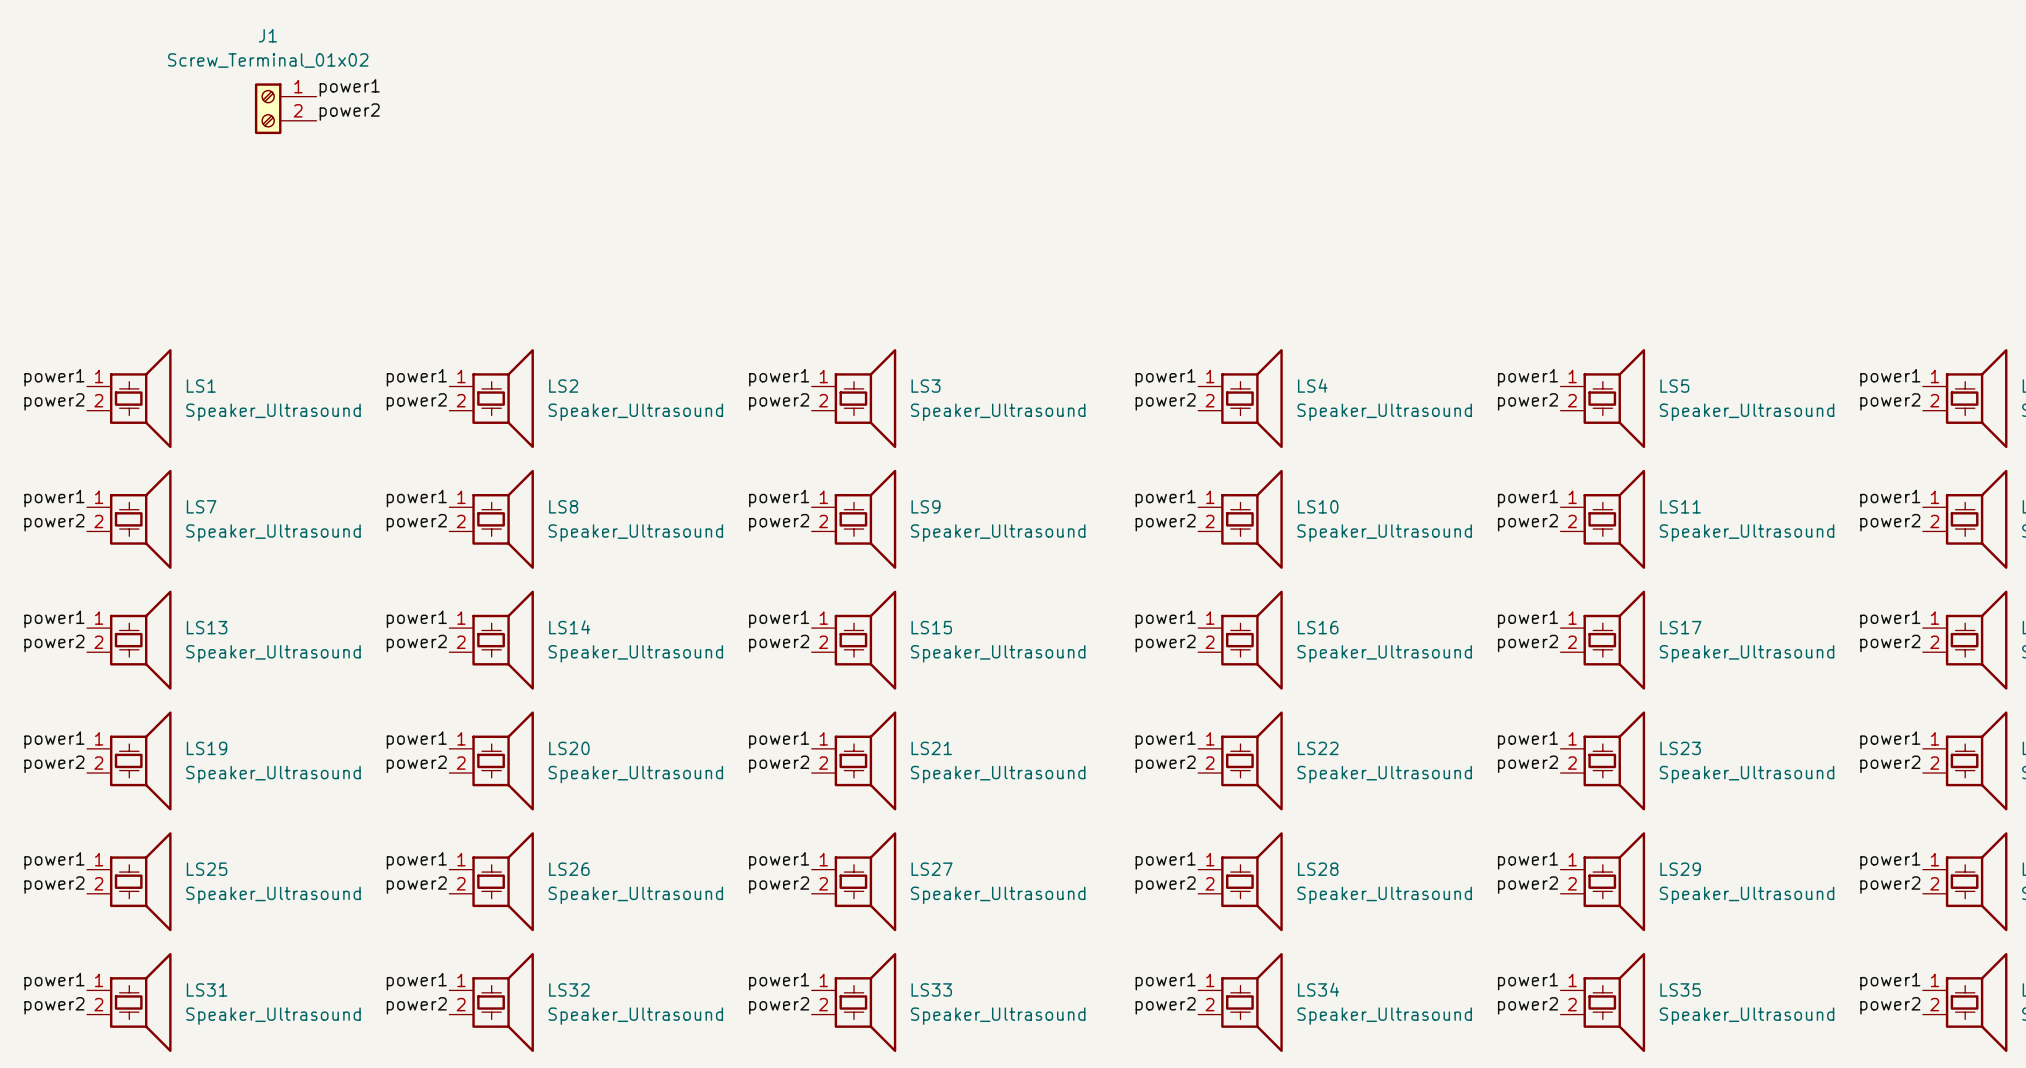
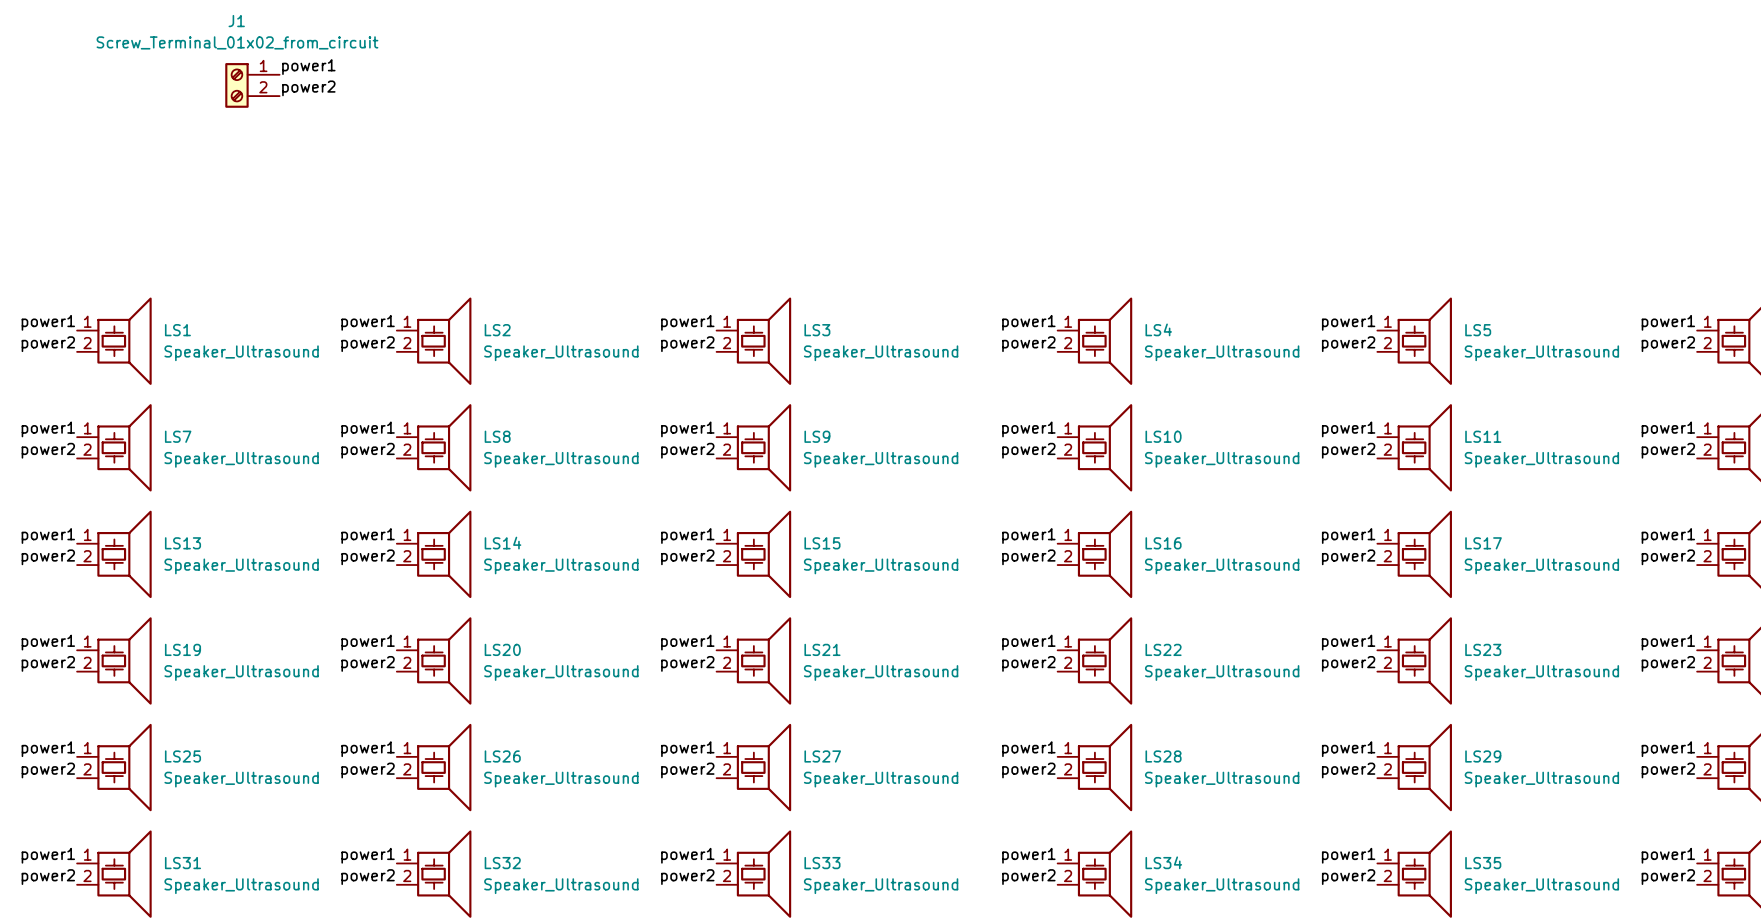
J1 value: Screw_Terminal_01x02 (268, 60) -> Screw_Terminal_01x02_from_circuit (237, 42)

